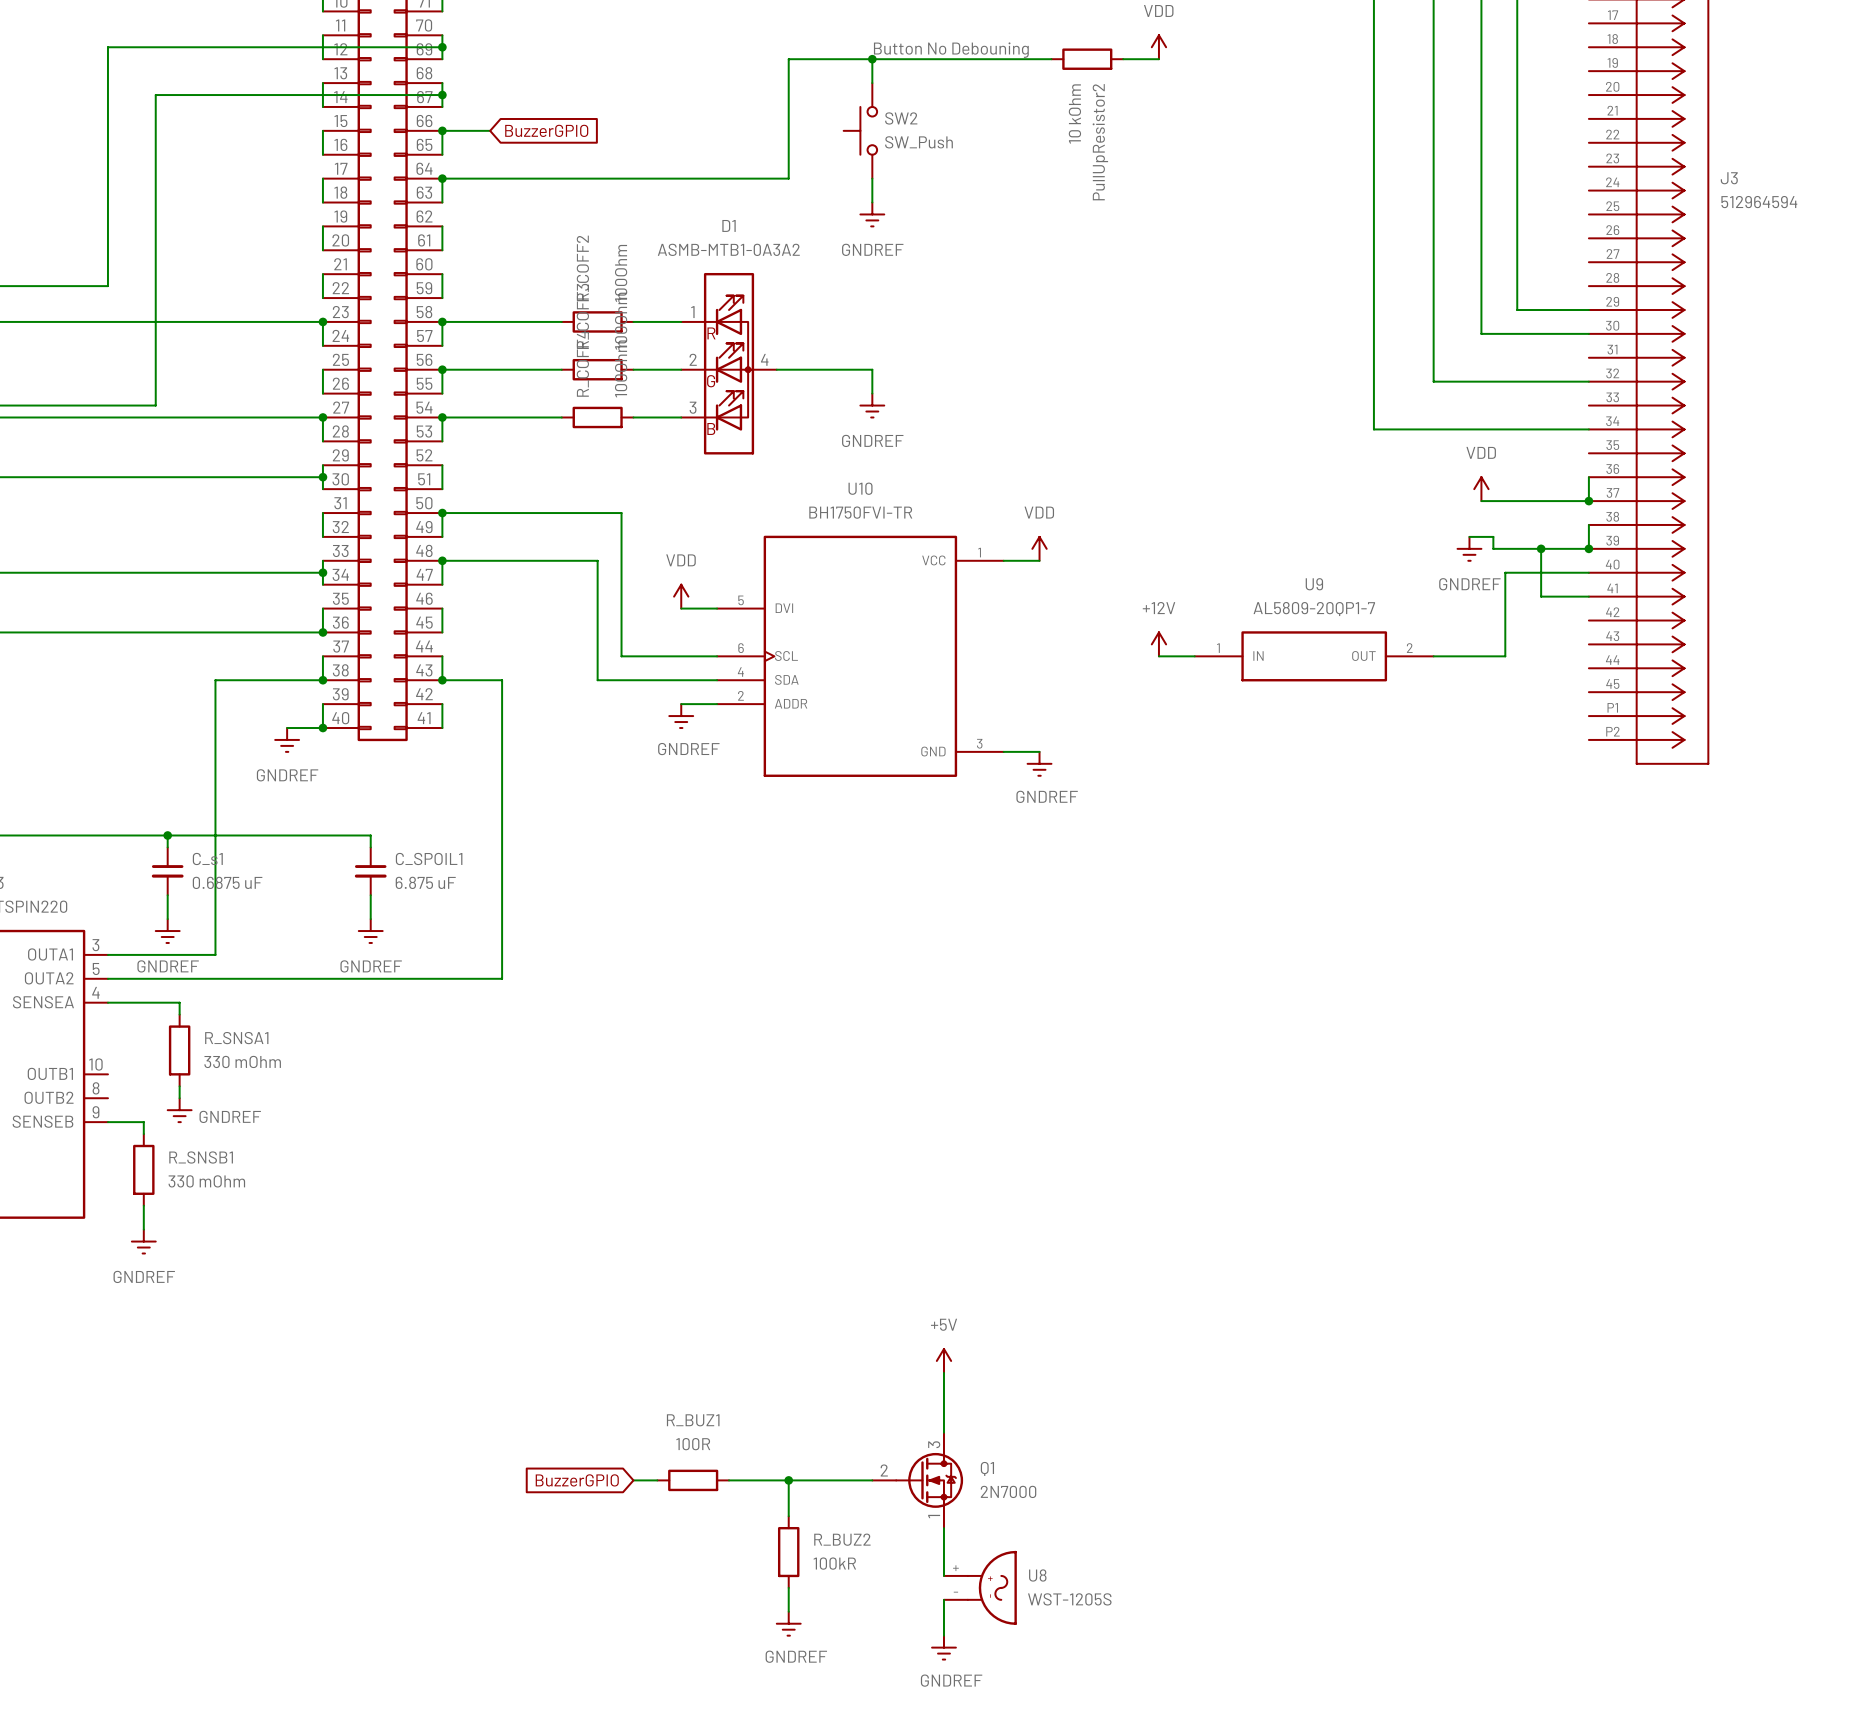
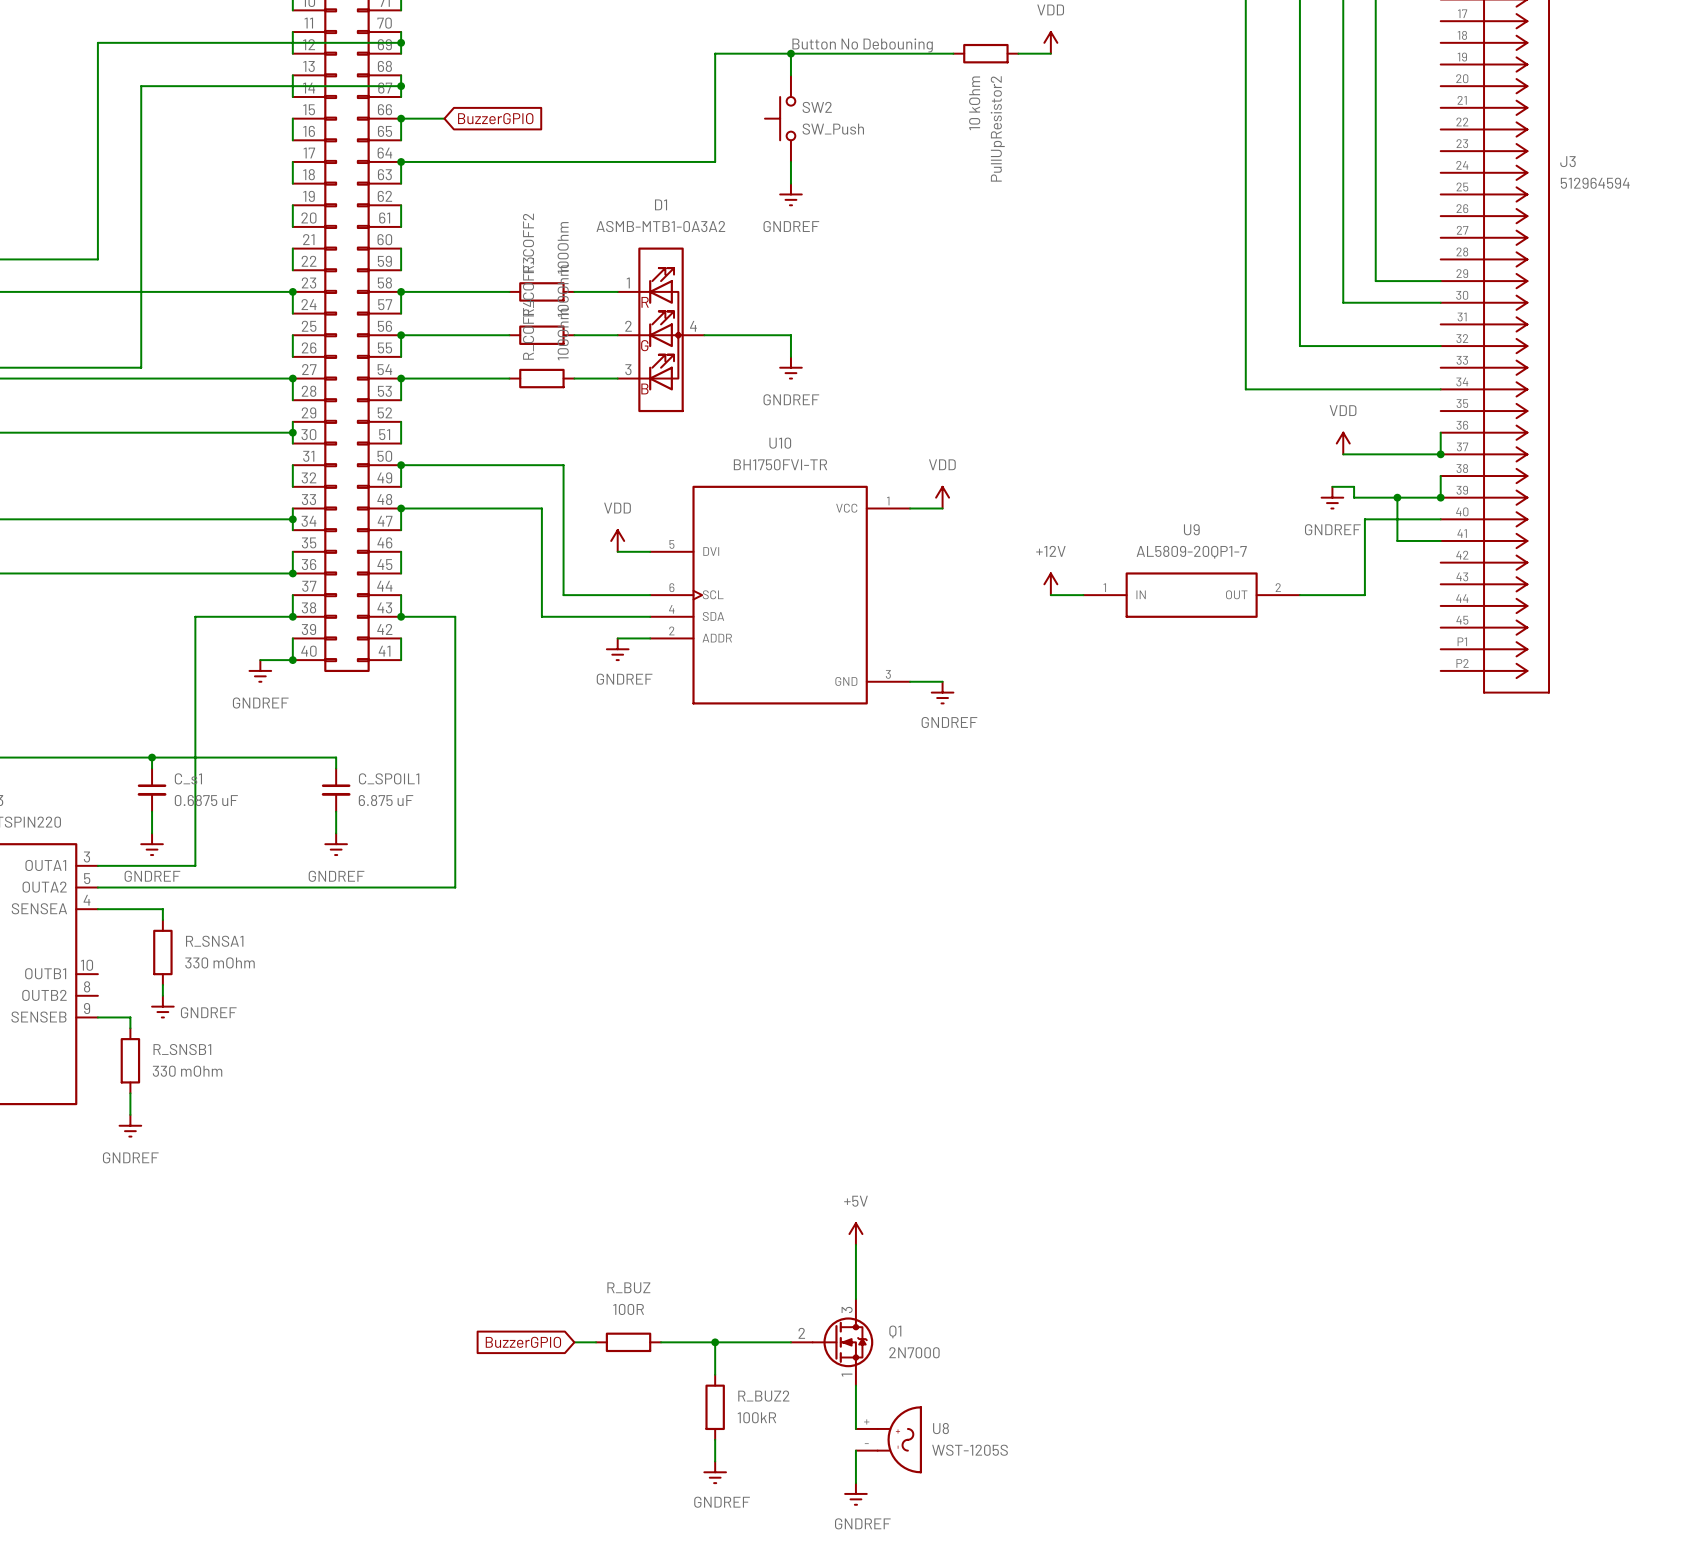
R_BUZ1 name: R_BUZ1 (693, 1420) -> R_BUZ (628, 1287)

